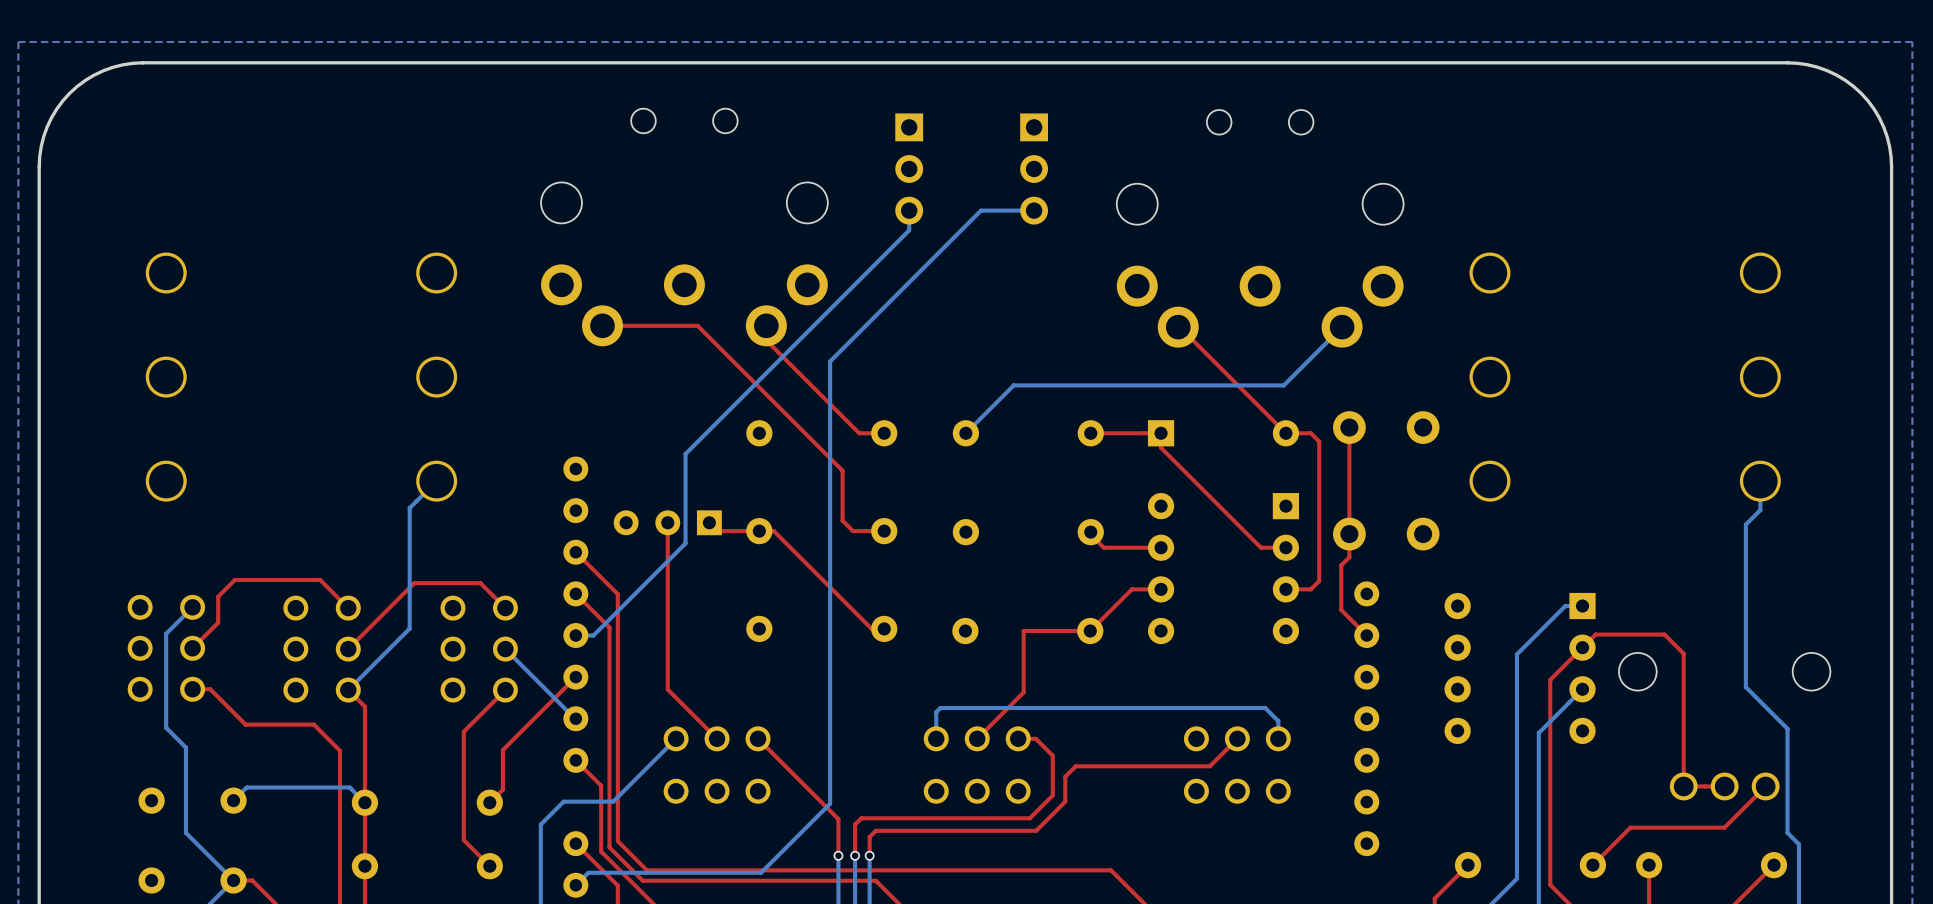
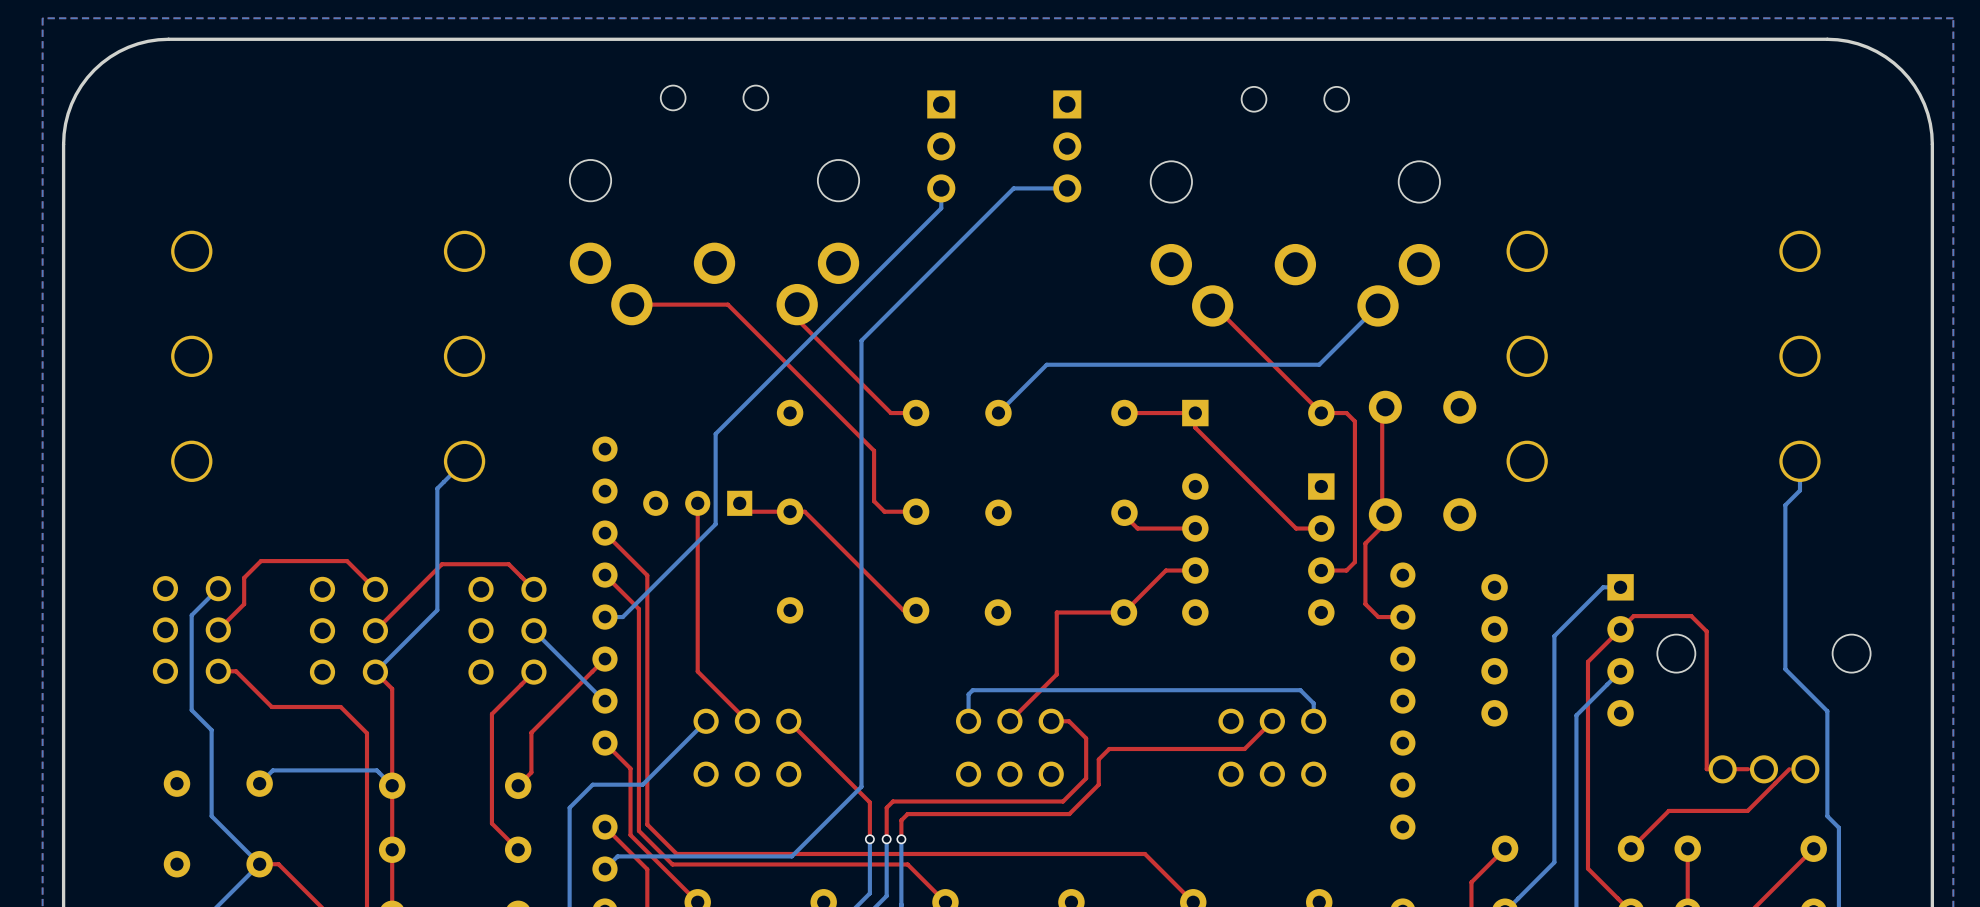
top track: (1349, 427) (1349, 557) (1341, 565) (1341, 609) (1366, 635) -> (1382, 410) (1382, 526) (1365, 543) (1365, 604) (1378, 617) (1402, 617)
top track: (1652, 634) (1664, 634) (1683, 653) (1683, 786) (1724, 786) -> (1691, 616) (1706, 631) (1706, 769) (1748, 769)
top track: (1765, 786) (1724, 827) (1708, 827) -> (1789, 769) (1747, 810)

